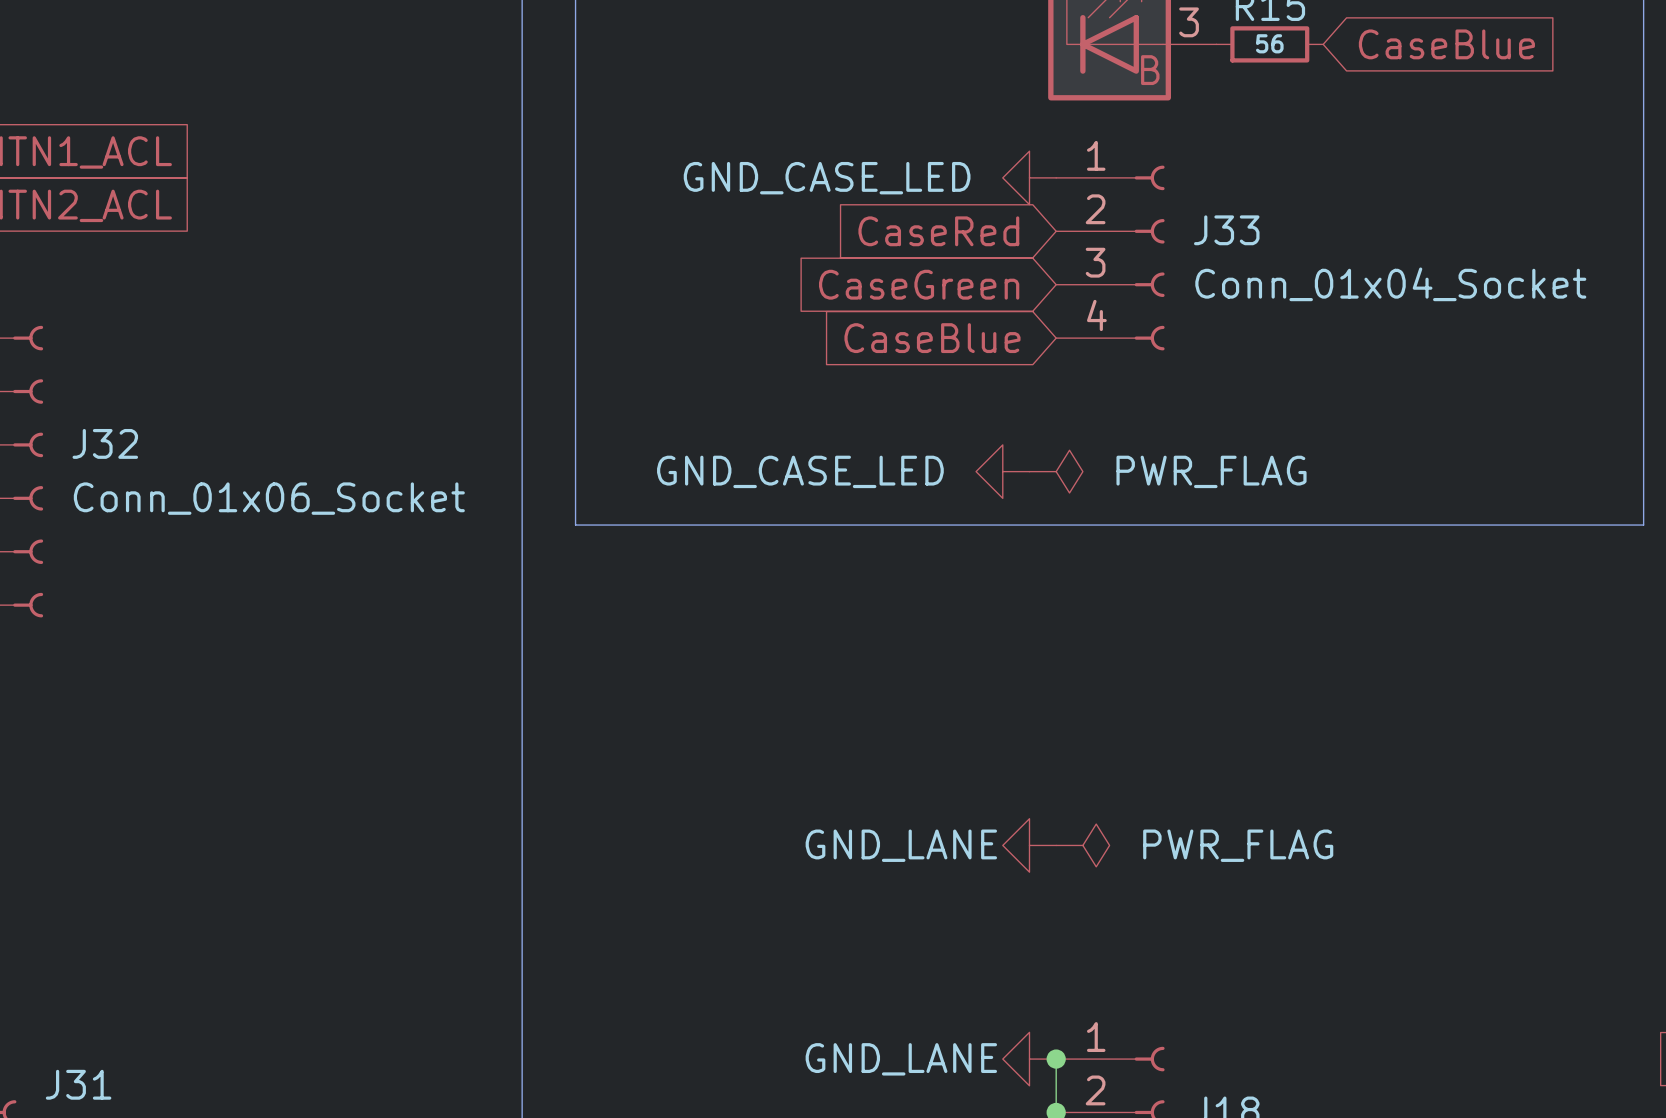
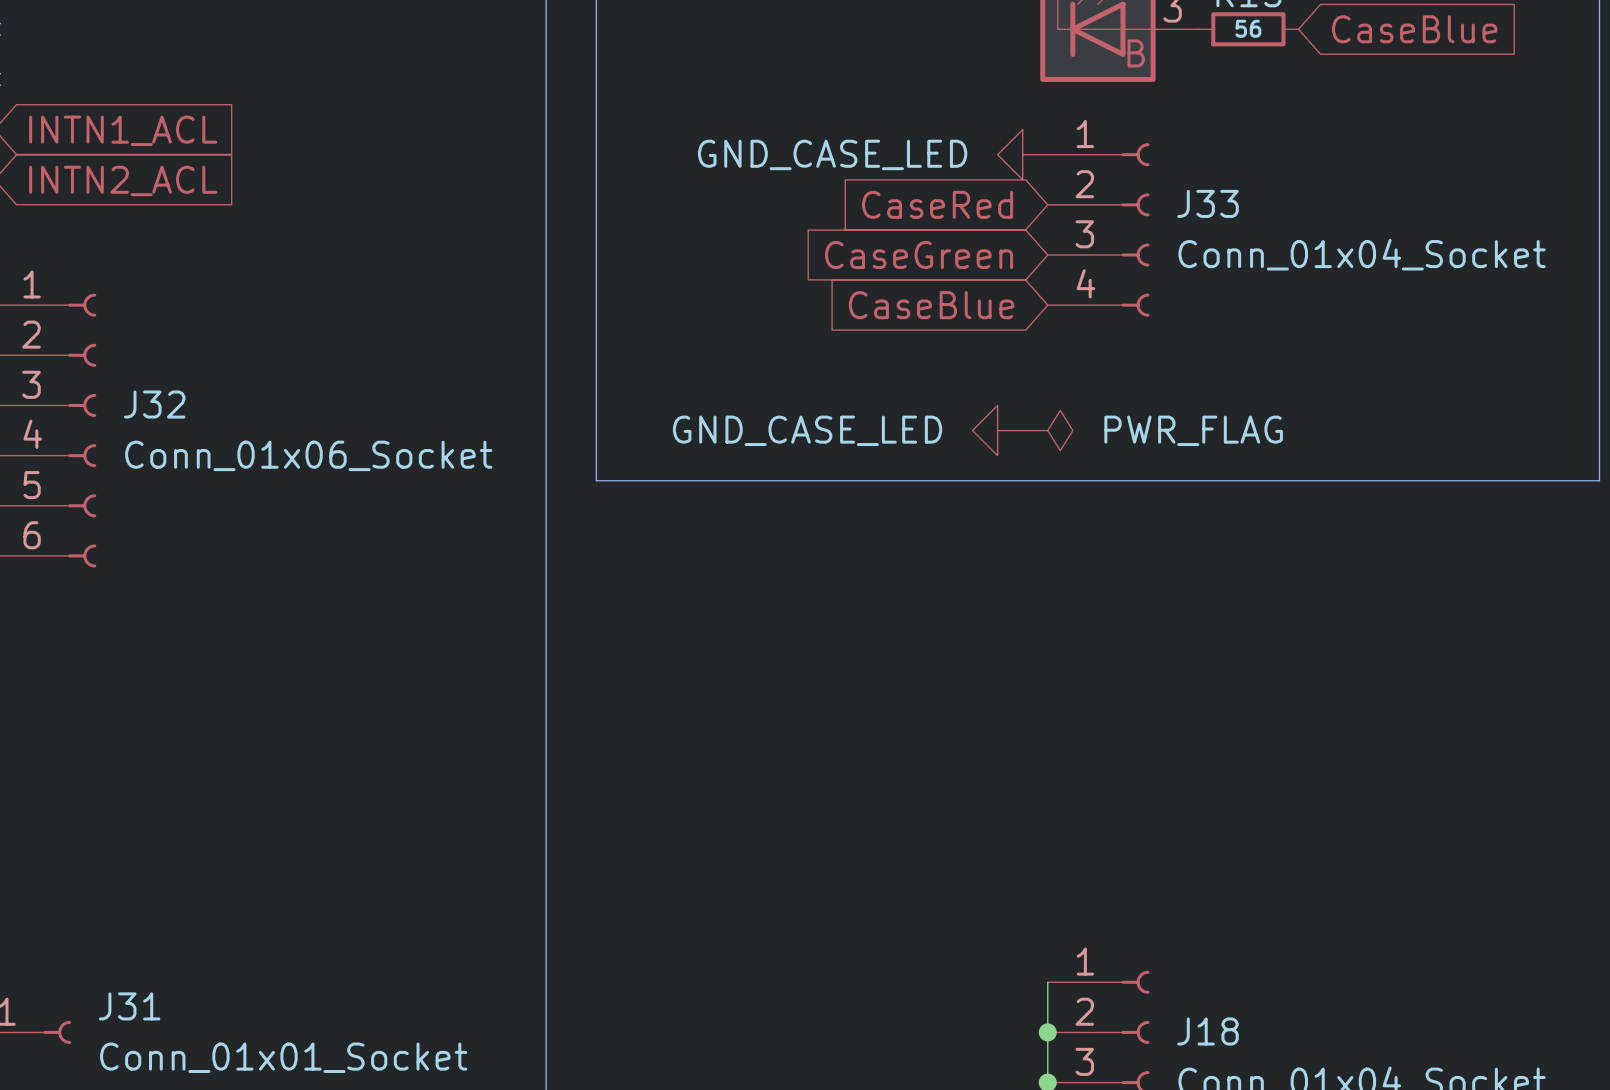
power symbol: GND_LANE (1029, 845) -> none
power symbol: PWR_FLAG (1082, 845) -> none
power symbol: GND_LANE (1029, 1059) -> none
junction: (1056, 1059) -> none

